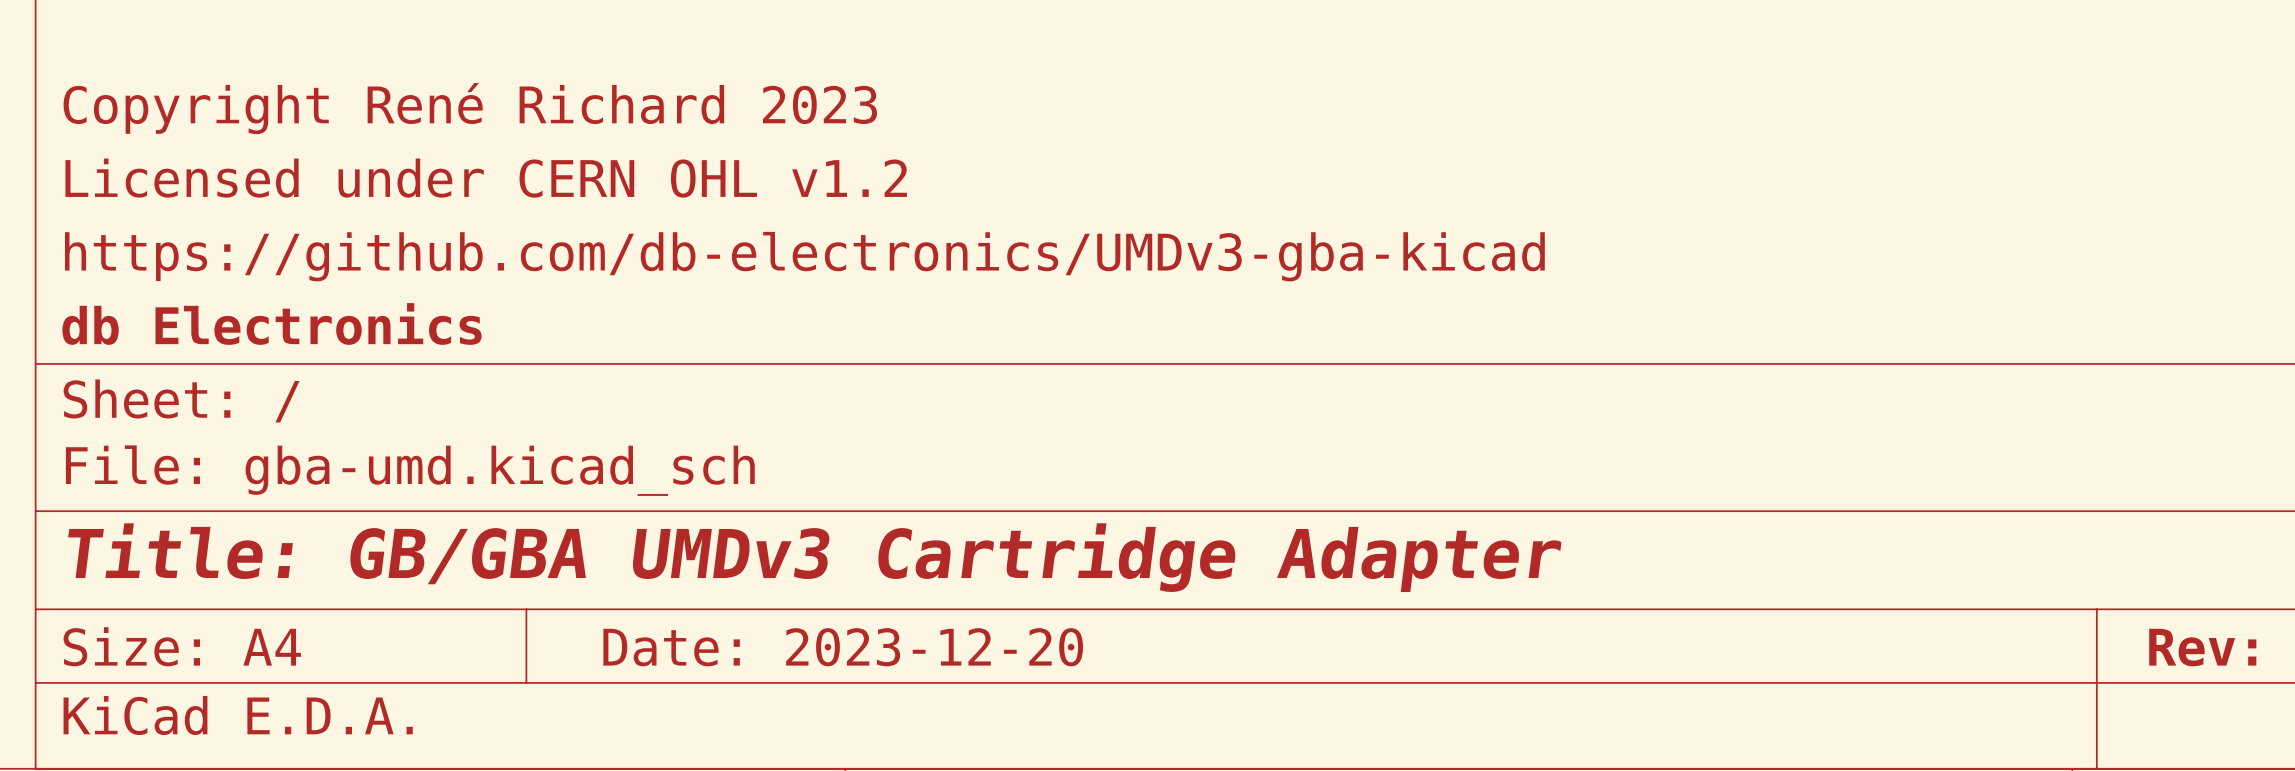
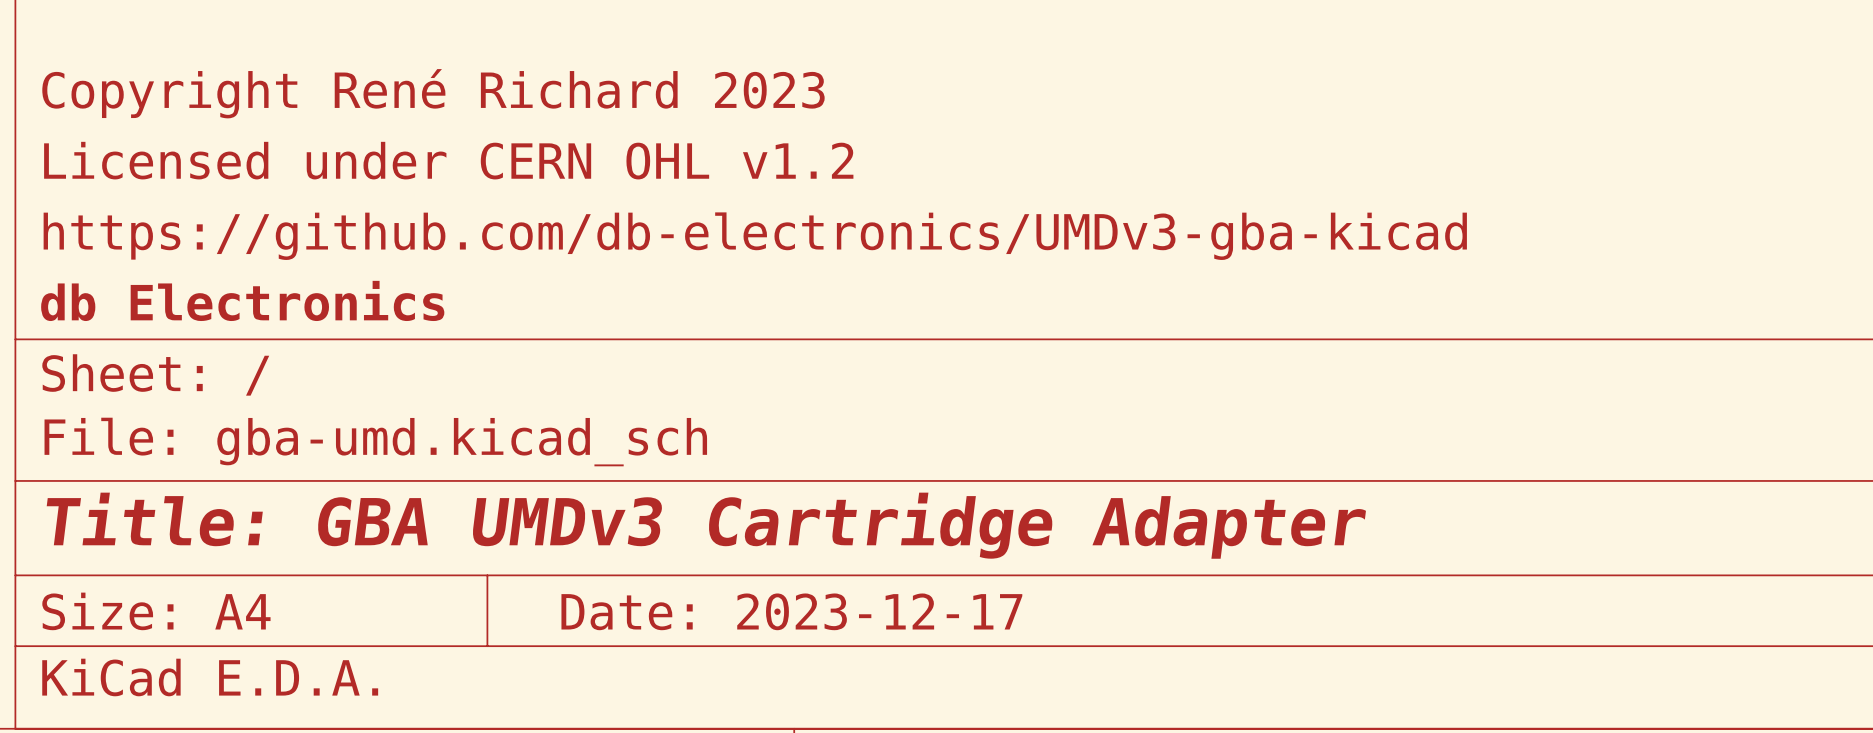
title block: Title: GB/GBA UMDv3 Cartridge Adapter (814, 557) -> Title: GBA UMDv3 Cartridge Adapter (706, 525)
title block: Date: 2023-12-20 (843, 647) -> Date: 2023-12-17 (791, 611)

